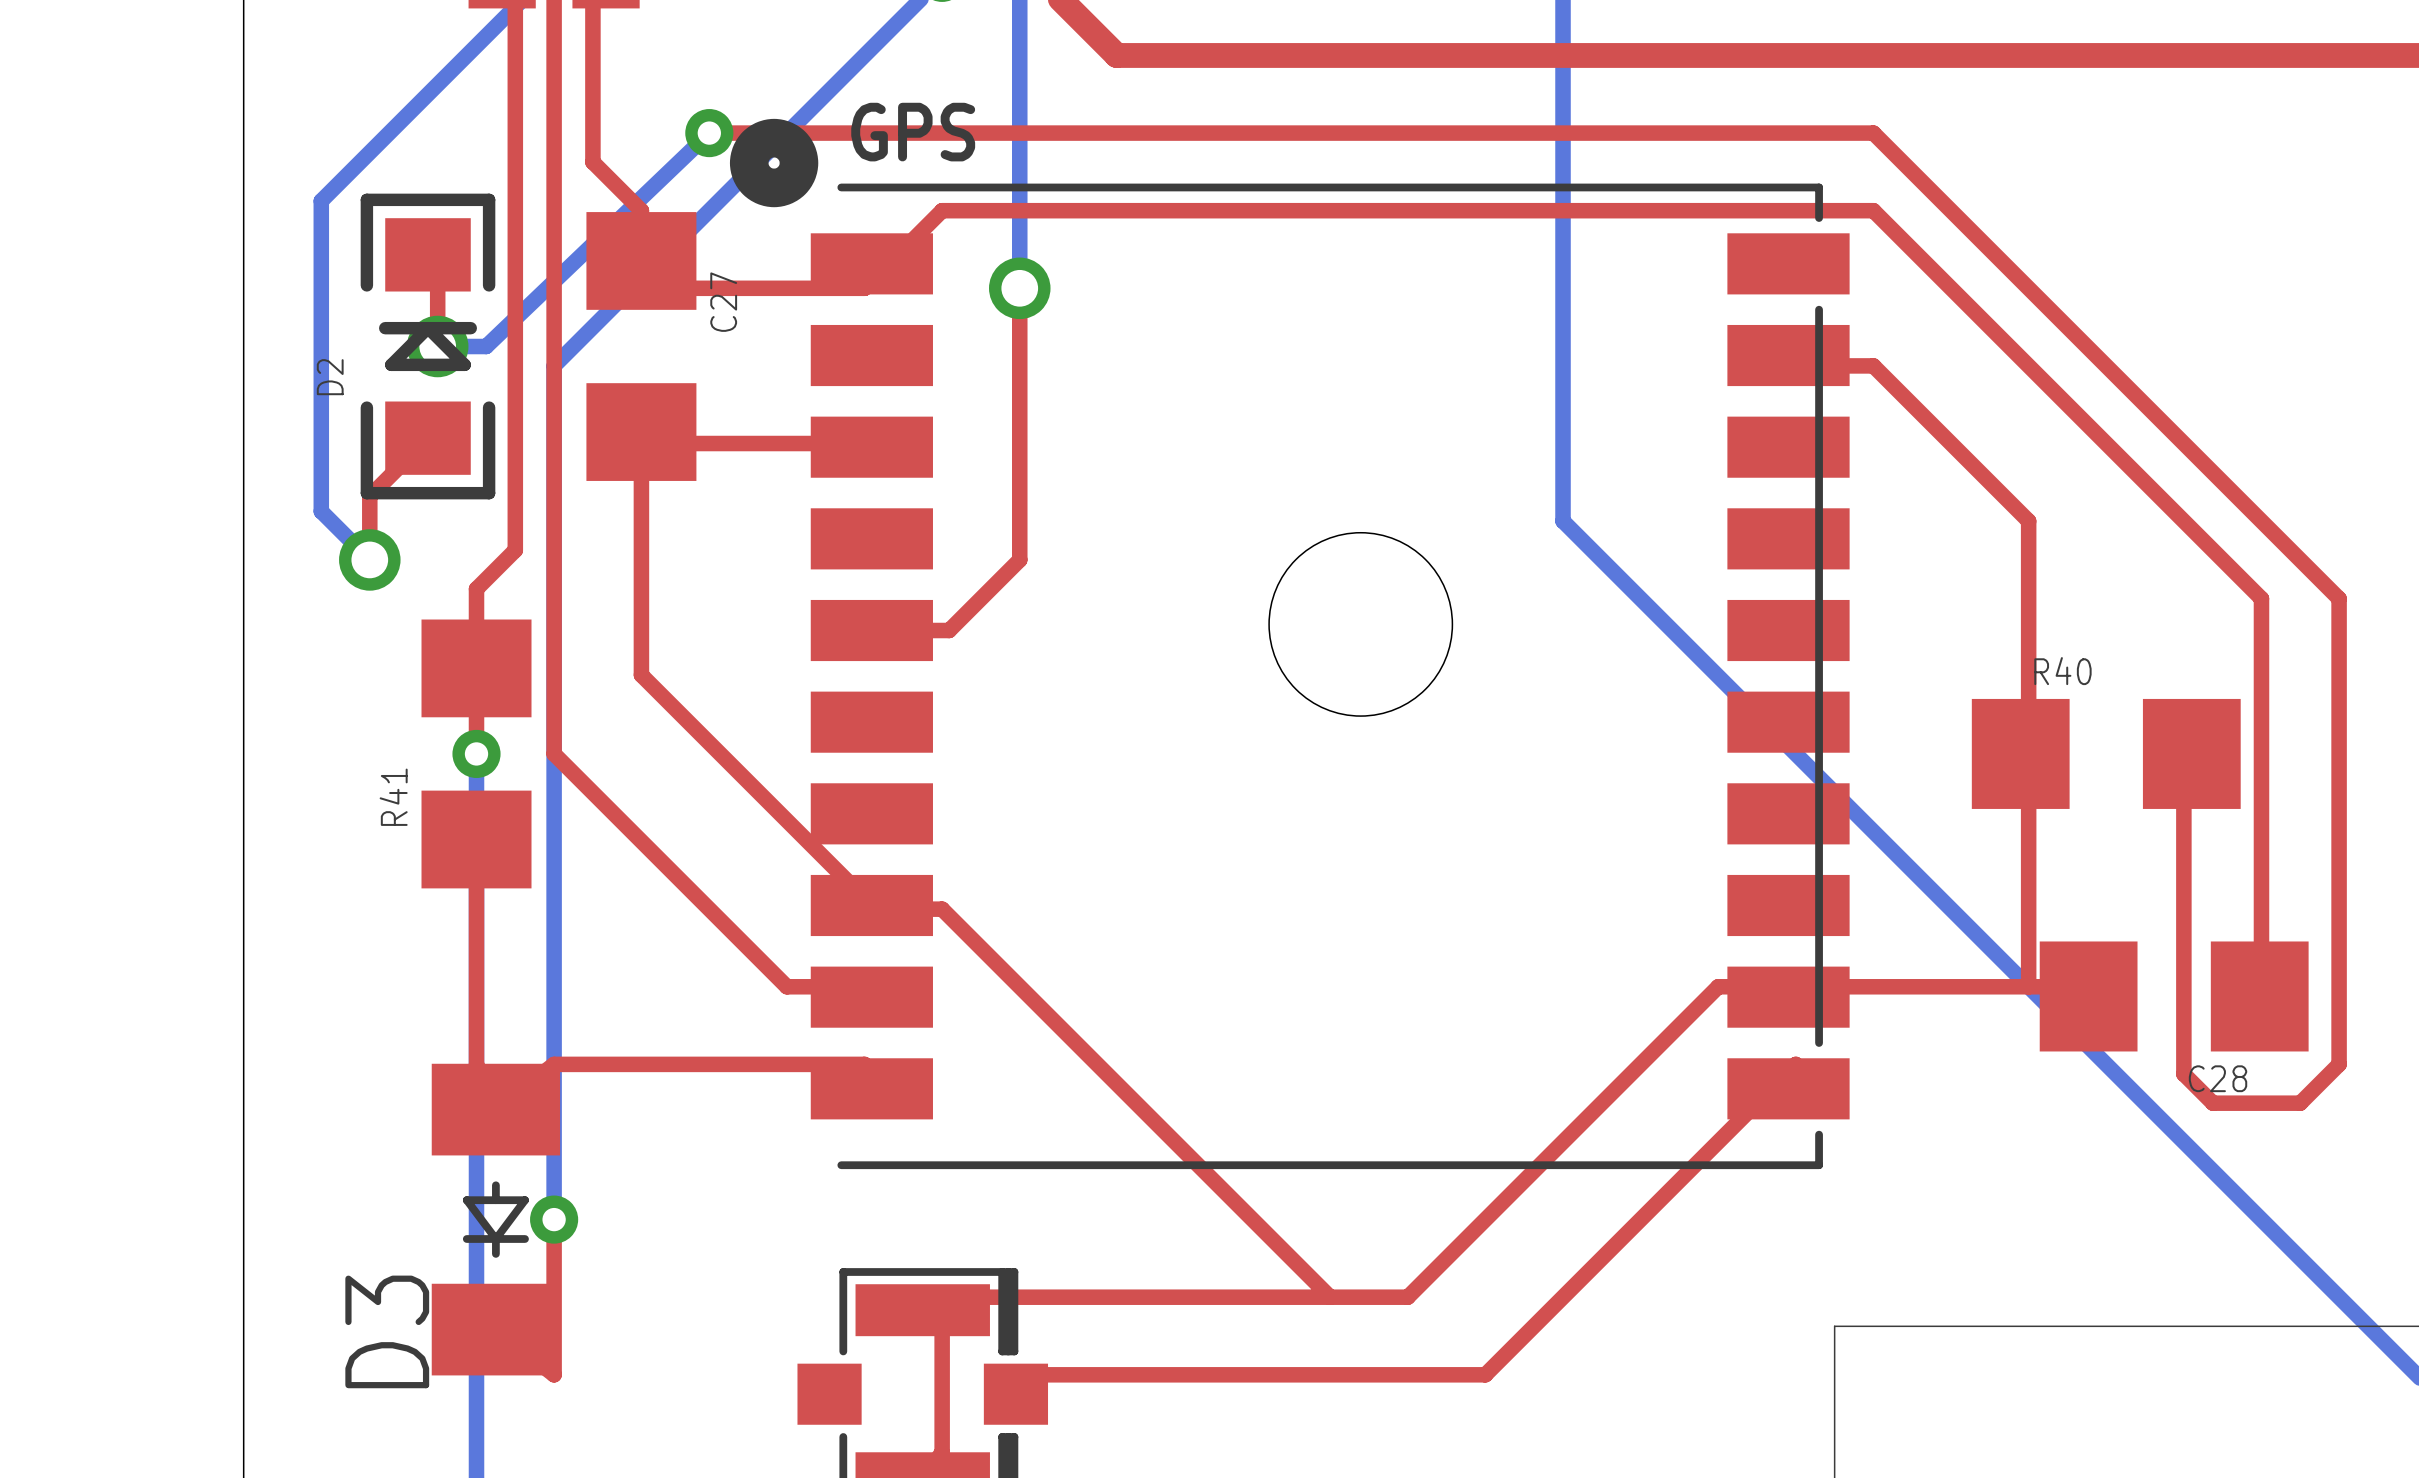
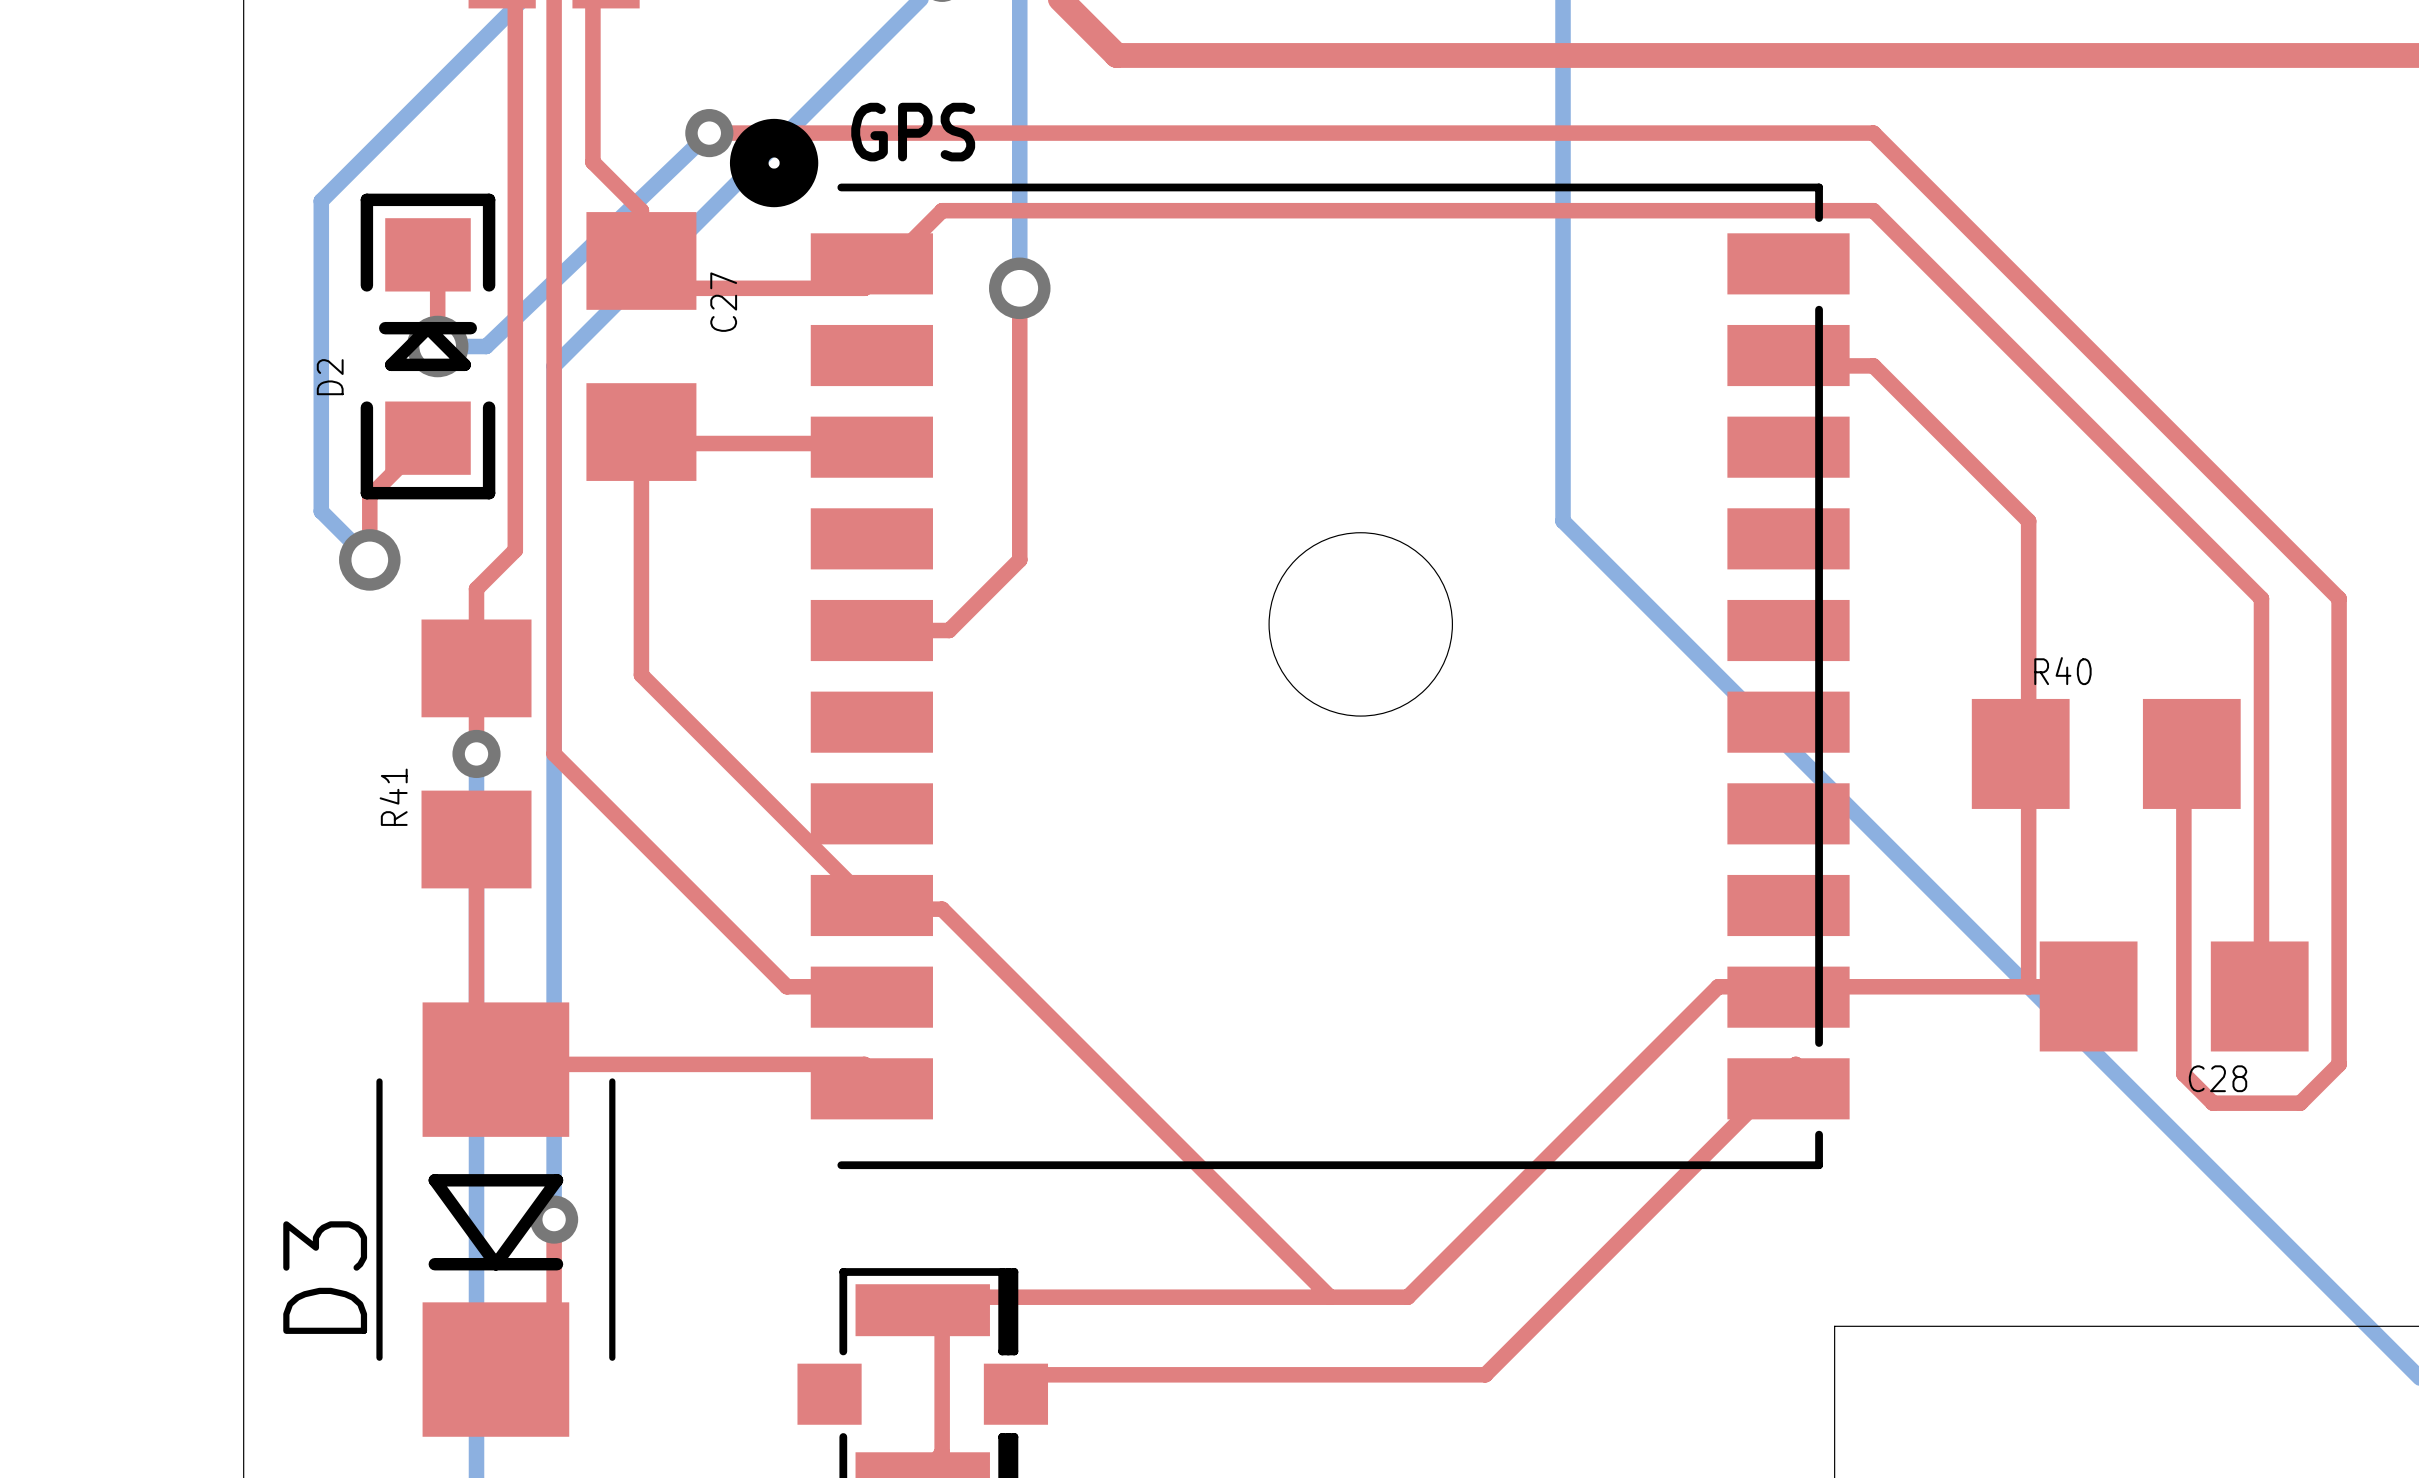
D3 footprint: [431, 1063, 561, 1376] -> [376, 1002, 616, 1437]

